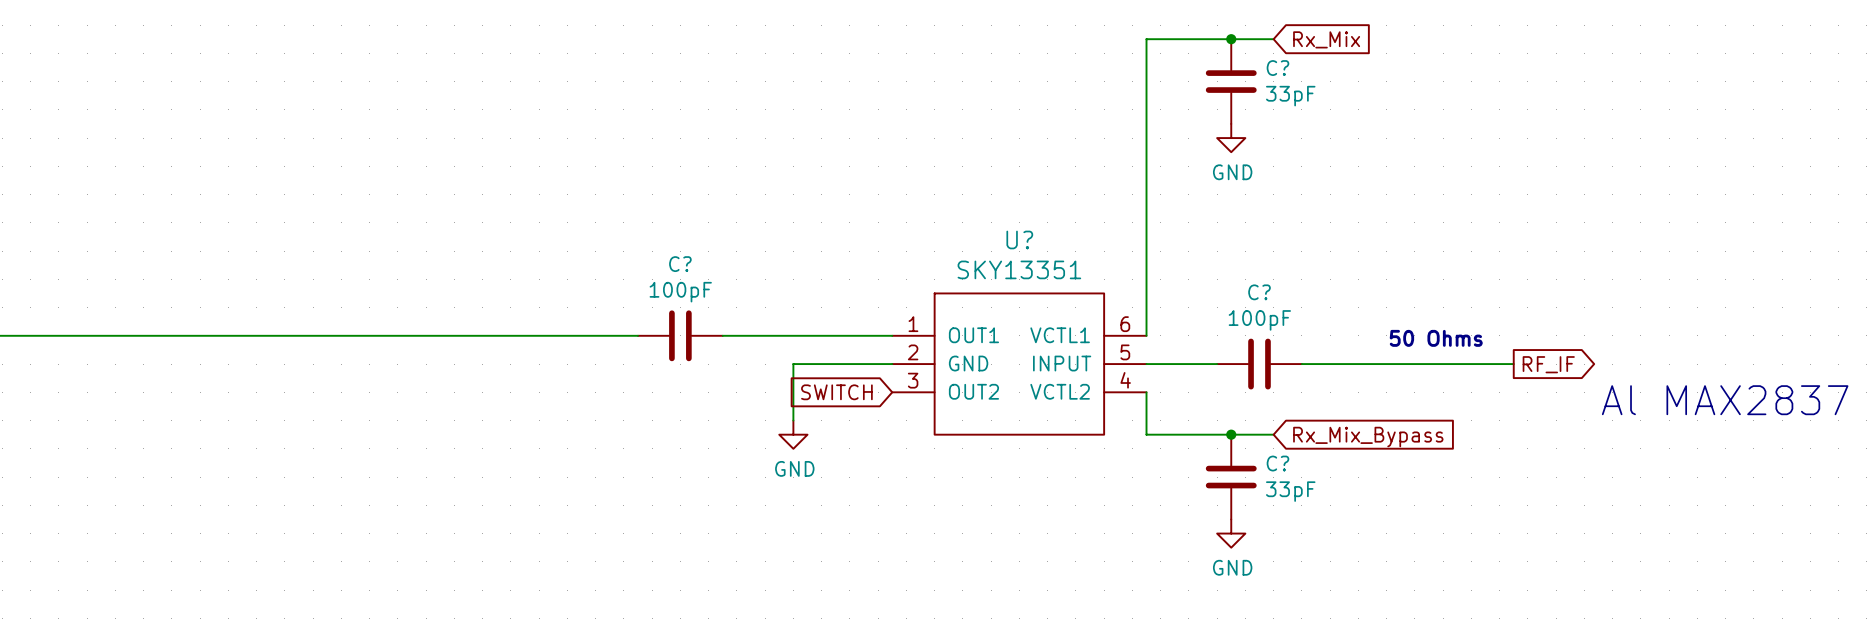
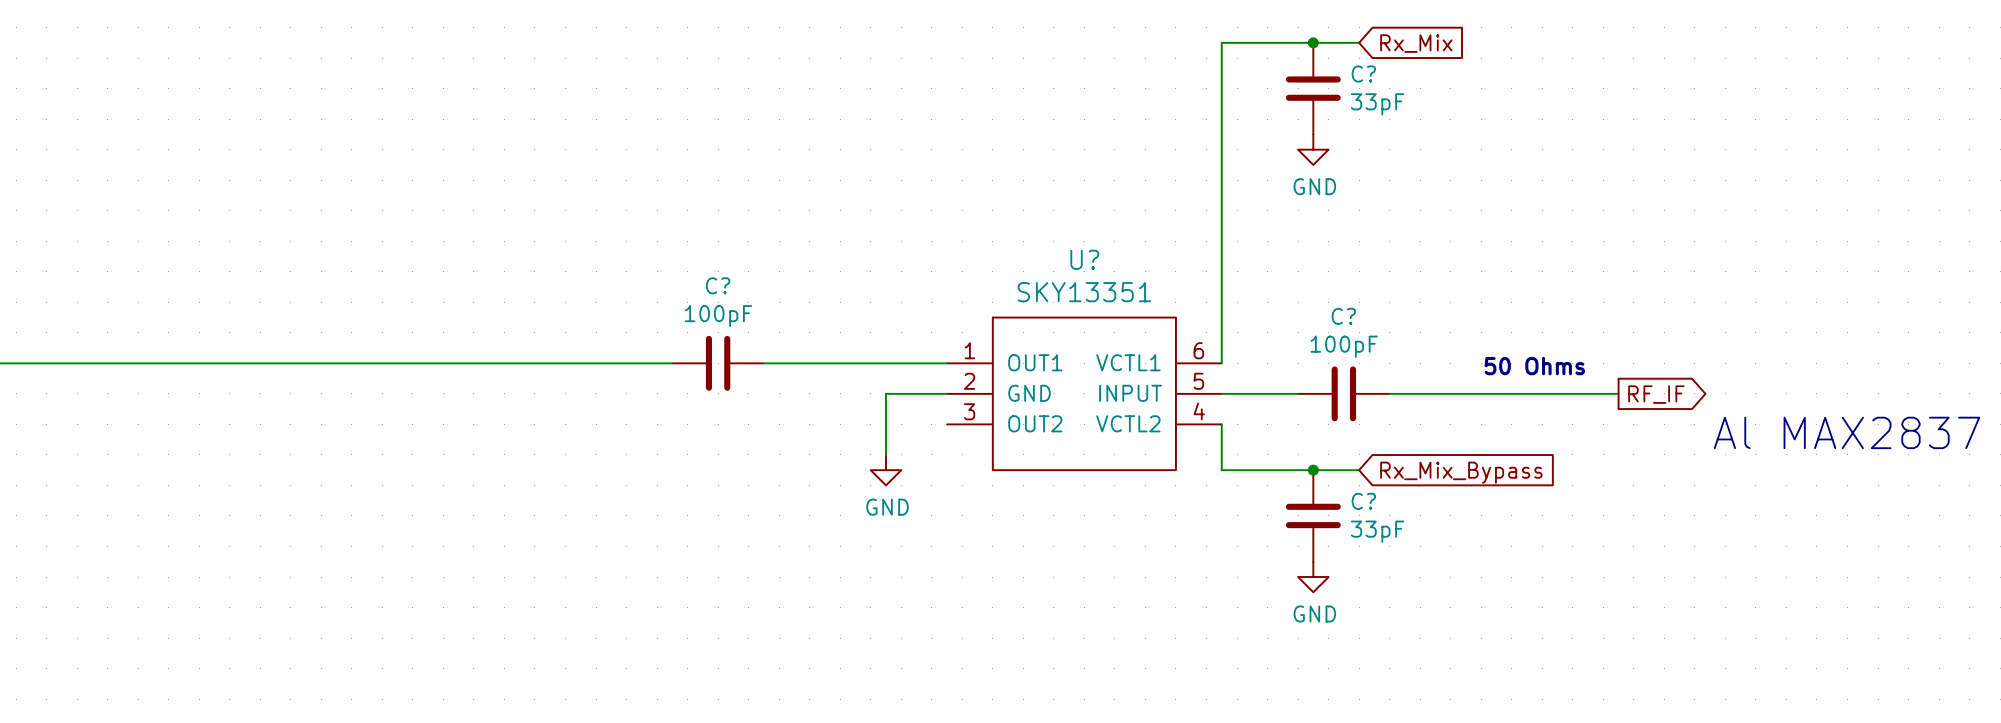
wire: (835, 364) (793, 364) (793, 420) -> (885, 393) (885, 454)
global label: SWITCH (836, 392) -> none
power symbol position: GND (793, 434) -> GND (885, 470)

